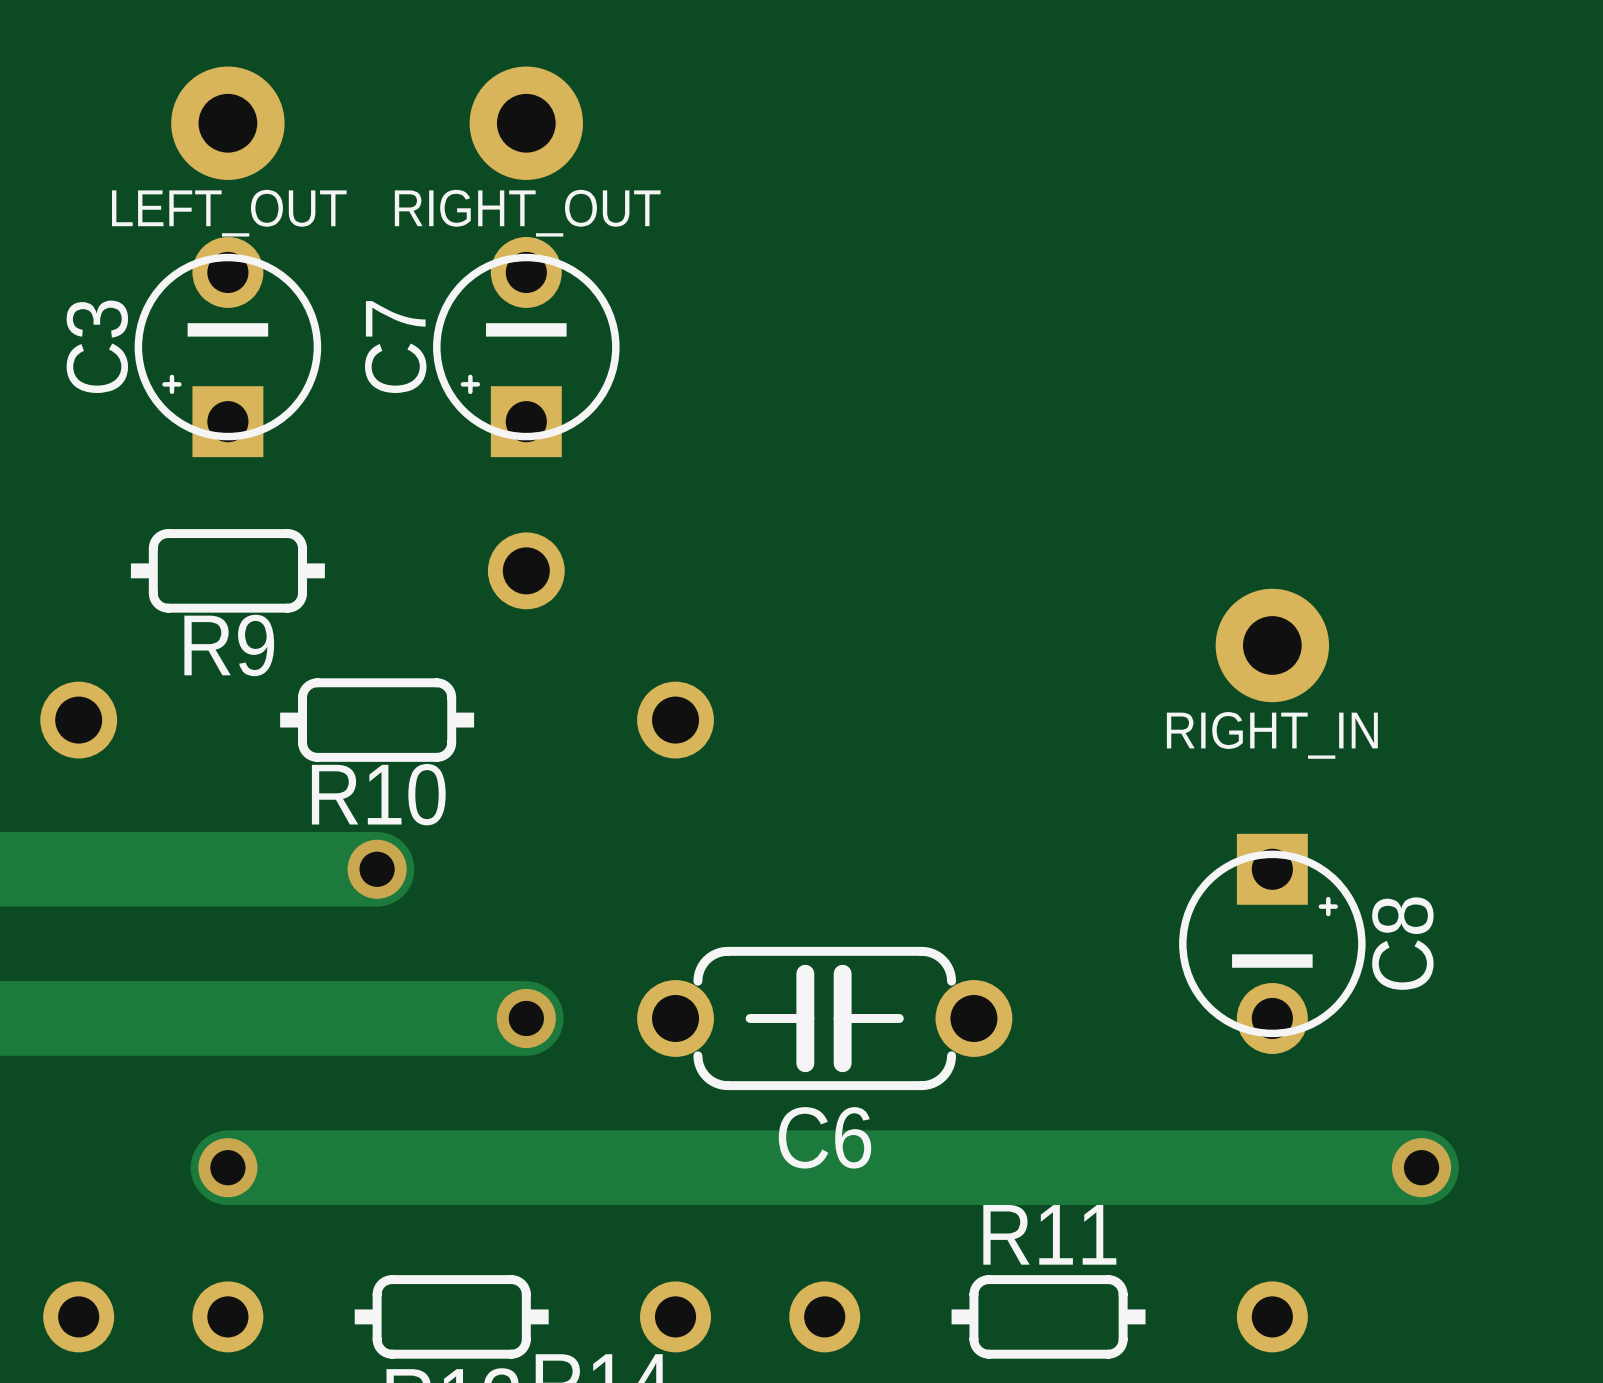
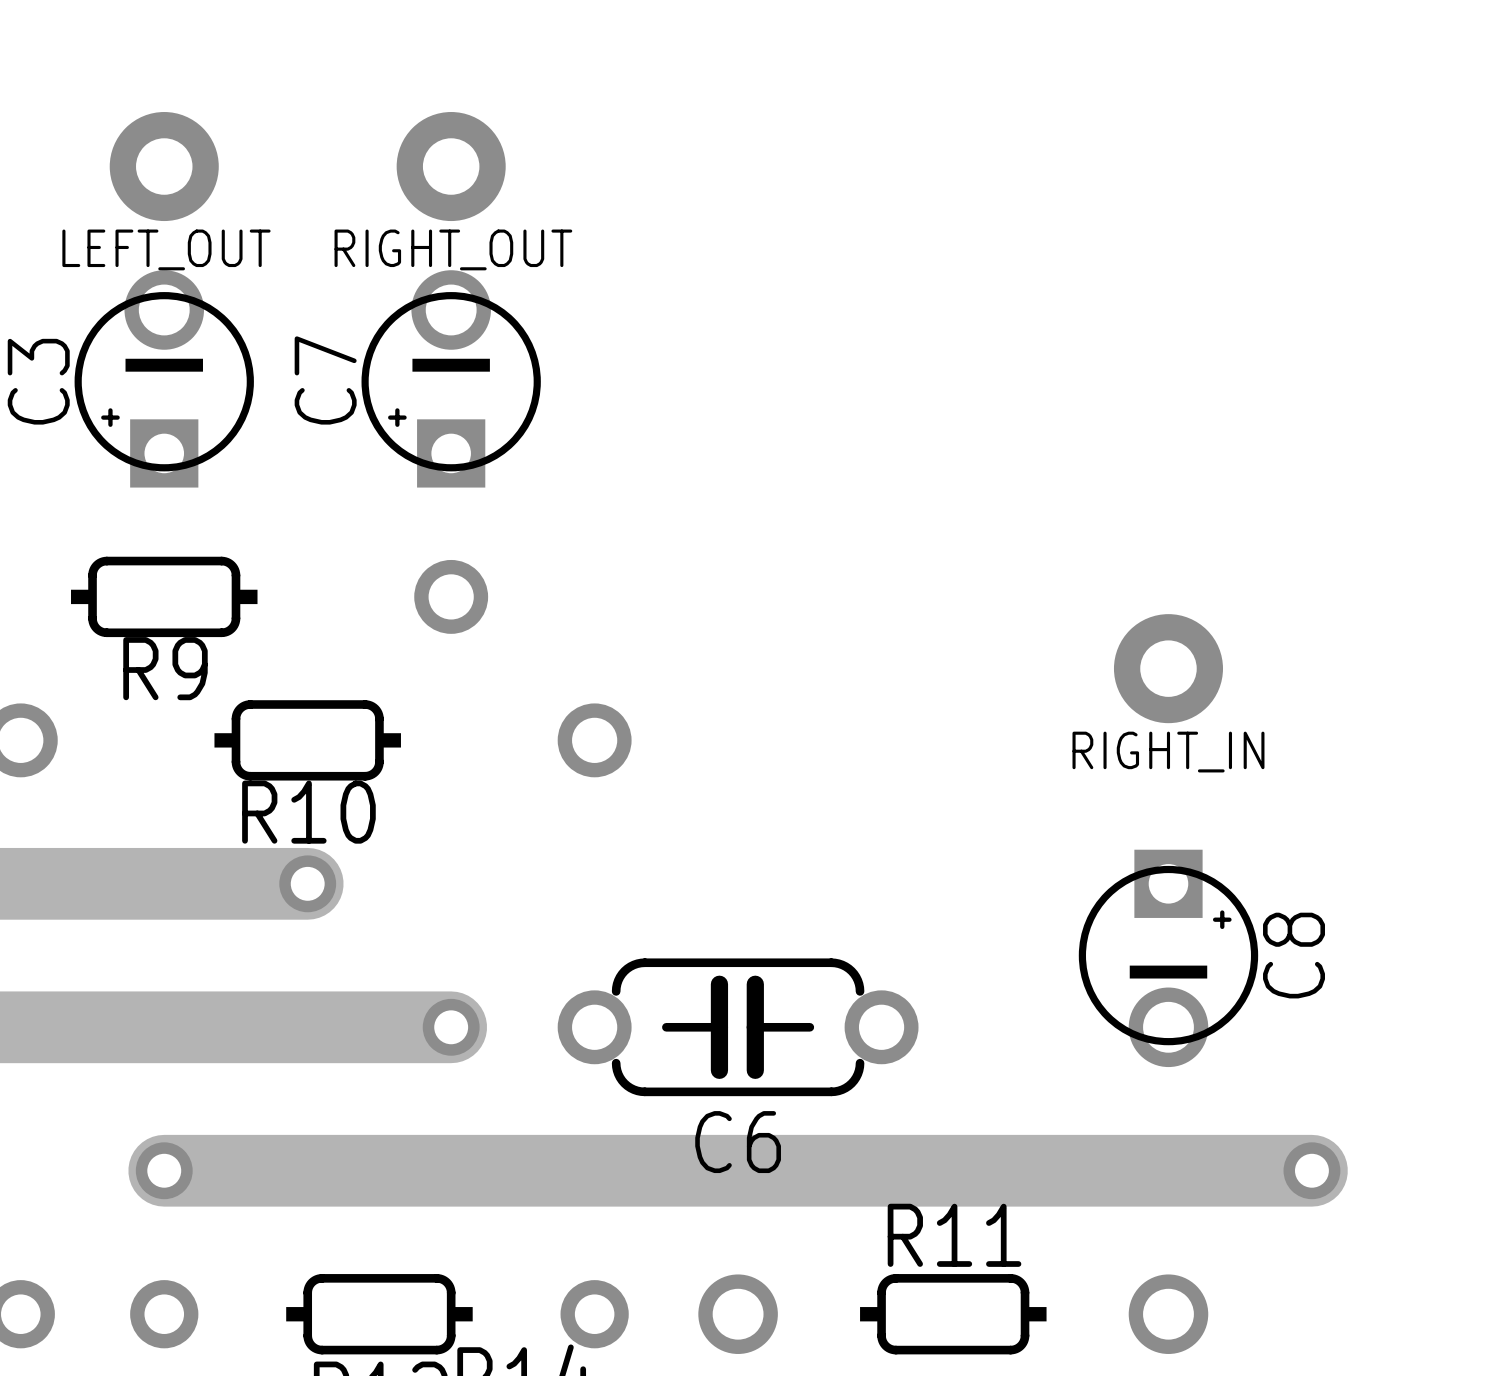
C3 footprint: [134, 236, 322, 458] -> [74, 270, 254, 488]
C7 footprint: [433, 236, 620, 458] -> [361, 270, 541, 488]
C8 footprint: [1179, 833, 1366, 1054] -> [1078, 849, 1259, 1068]
R11 footprint: [789, 1275, 1308, 1359] -> [698, 1274, 1209, 1355]

